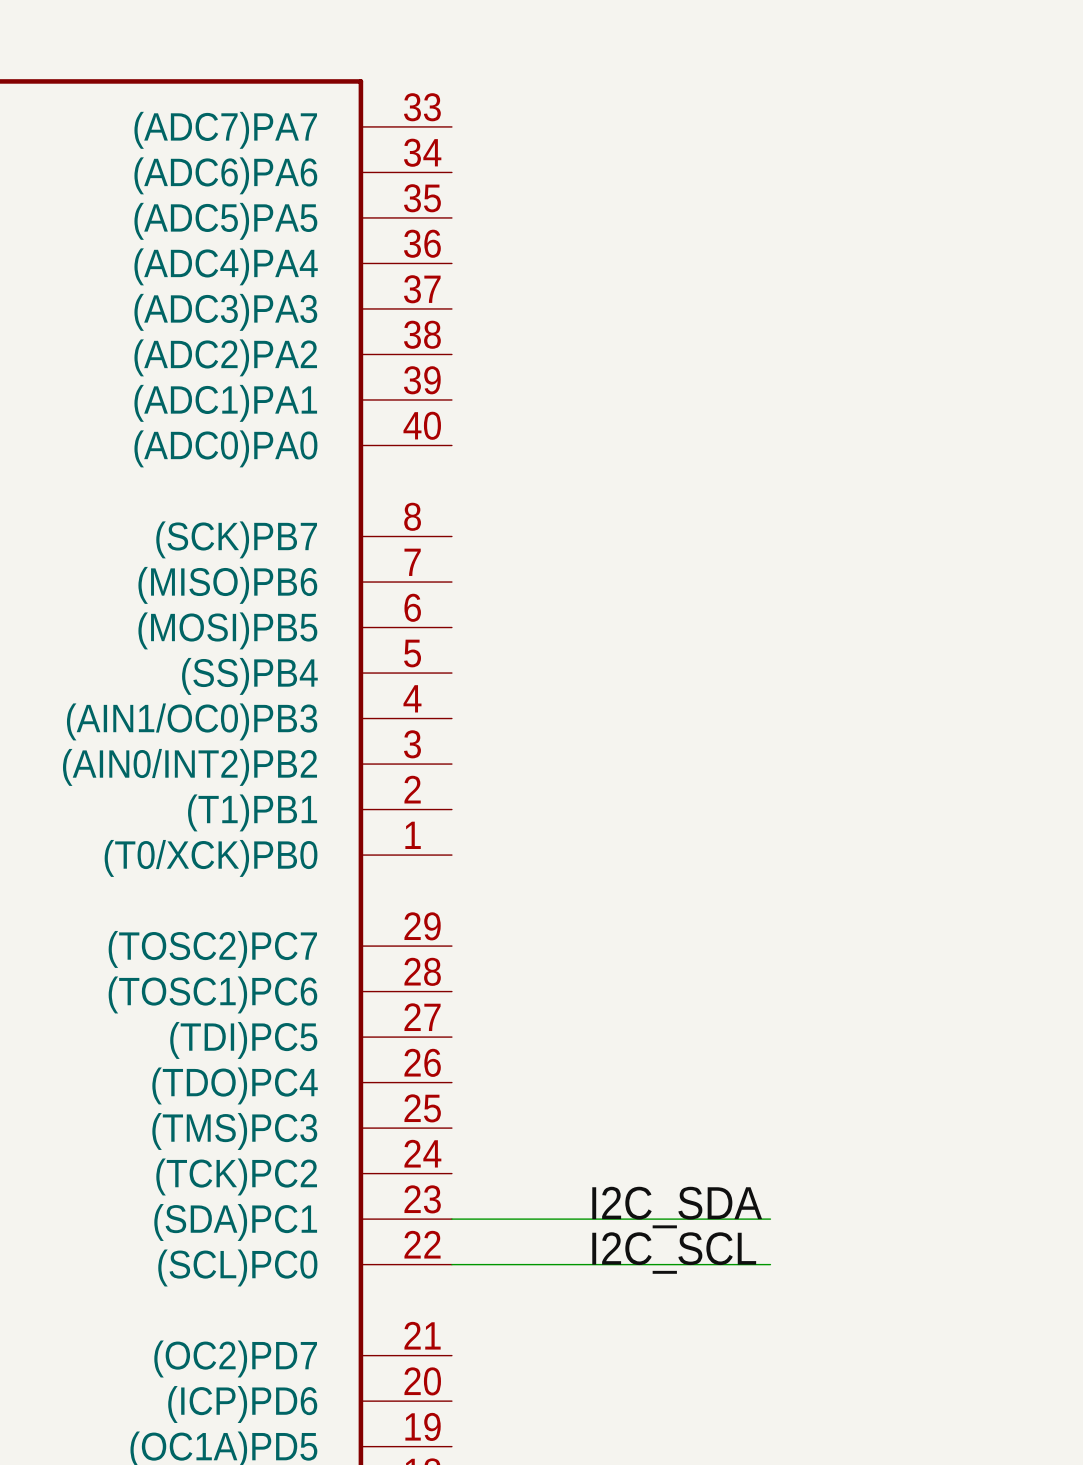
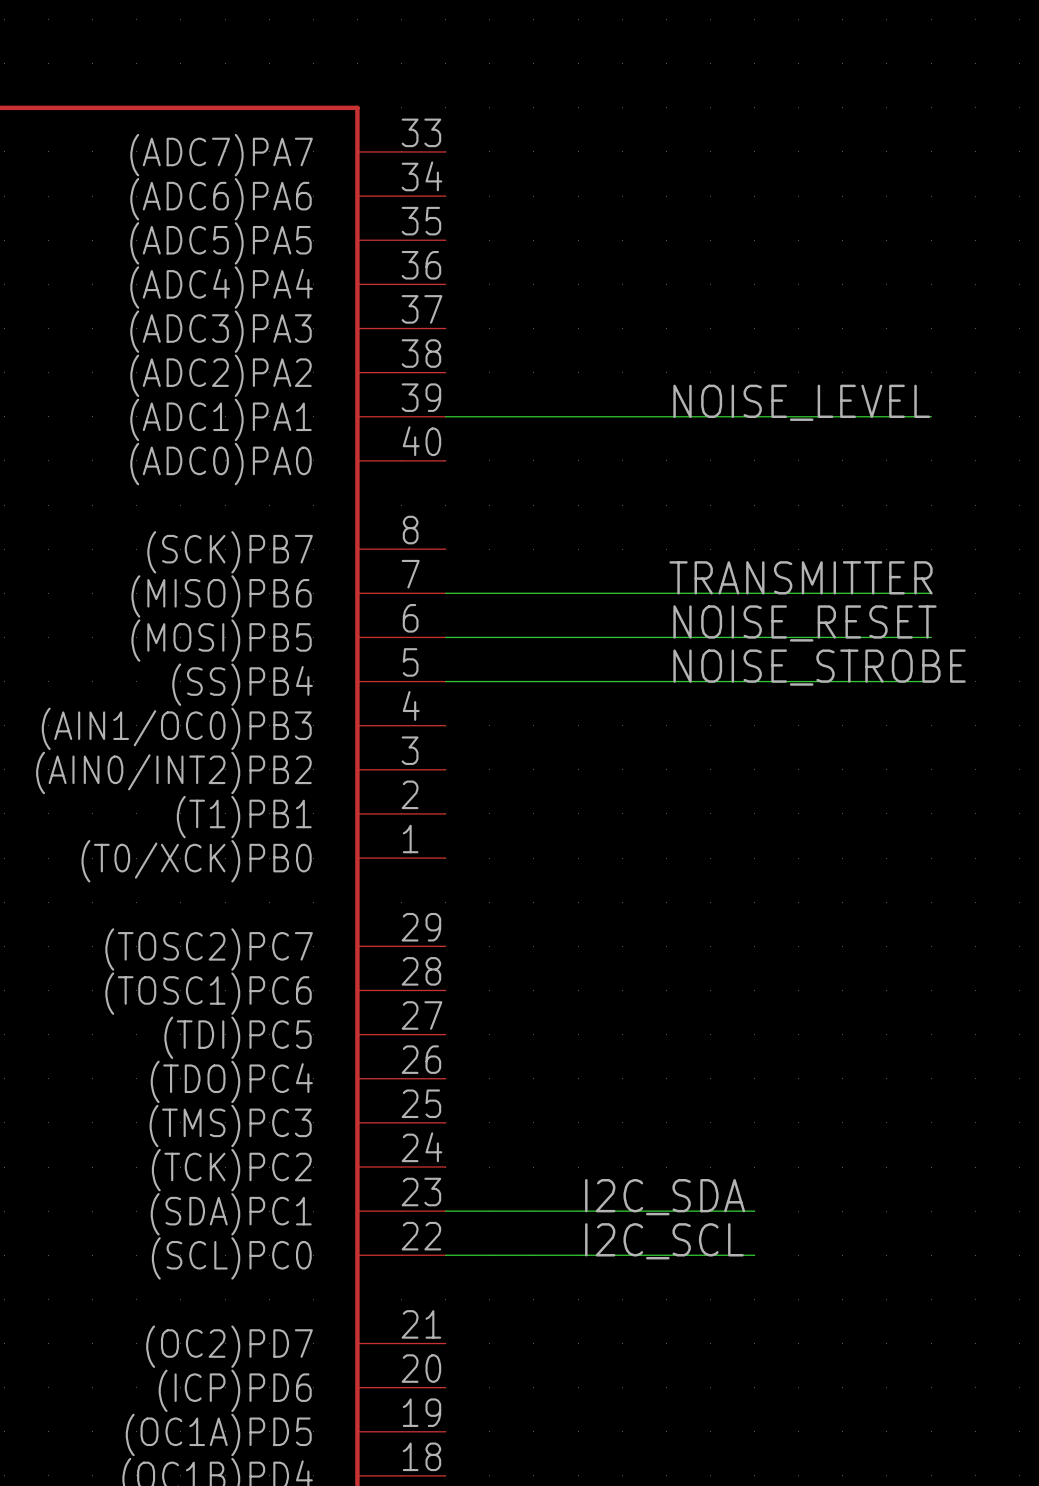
label: none -> NOISE_LEVEL (801, 402)
wire: none -> (445, 416) (931, 416)
label: none -> TRANSMITTER (801, 577)
wire: none -> (445, 593) (931, 593)
label: none -> NOISE_RESET (804, 623)
wire: none -> (445, 637) (931, 637)
label: none -> NOISE_STROBE (819, 667)
wire: none -> (445, 681) (931, 681)

